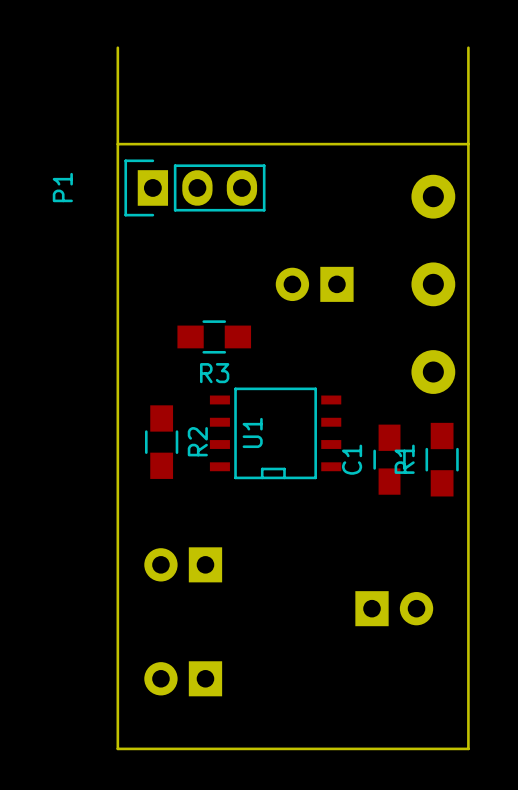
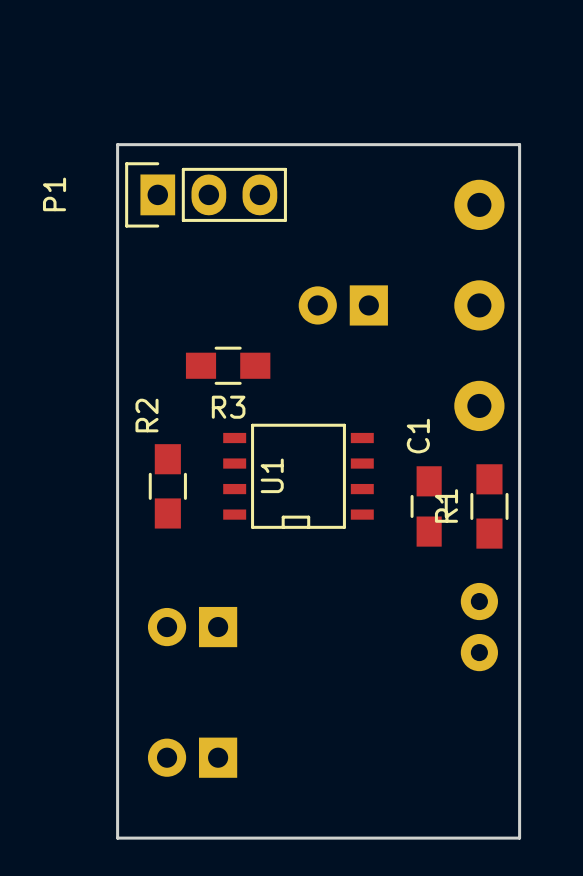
board edge: (117, 47) (117, 144) -> none
board edge: (468, 47) (468, 144) -> none
R2 name position: R2 (197, 441) -> R2 (146, 415)
C1 name position: C1 (352, 459) -> C1 (418, 436)
part: none -> (479, 627)
part: (394, 608) -> none

